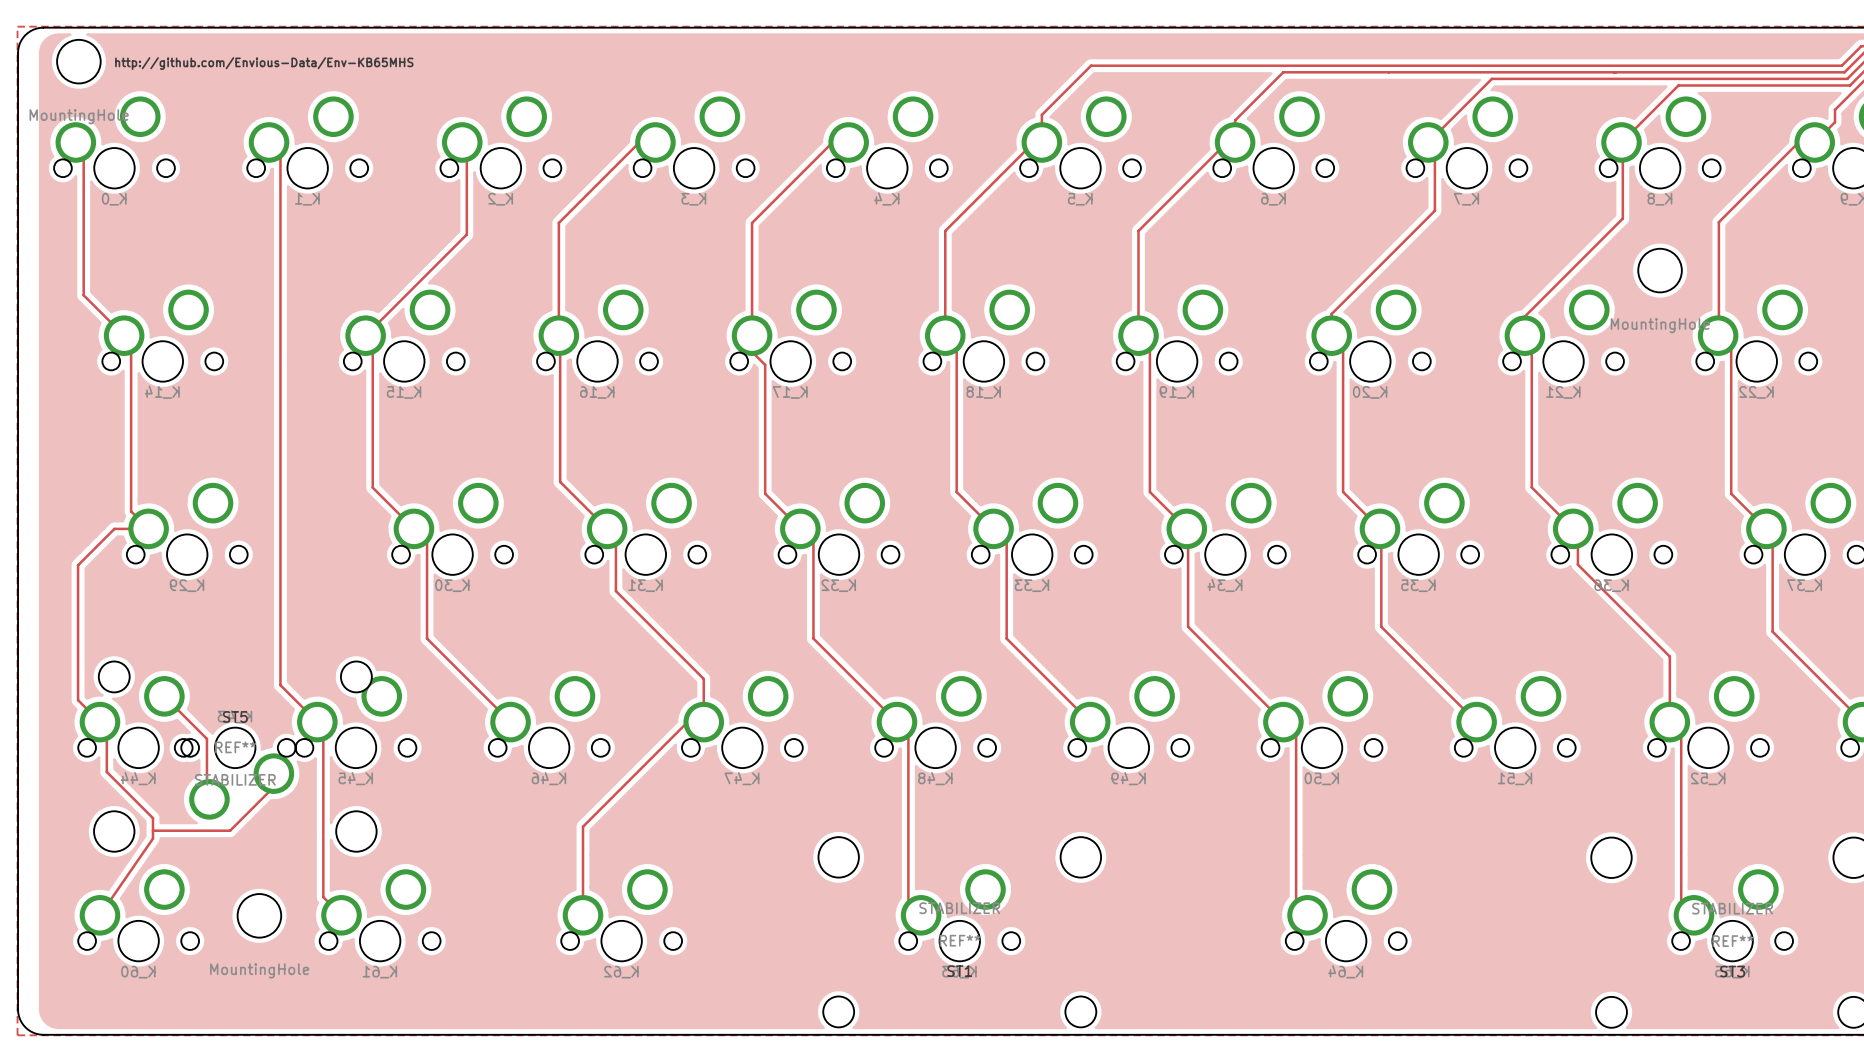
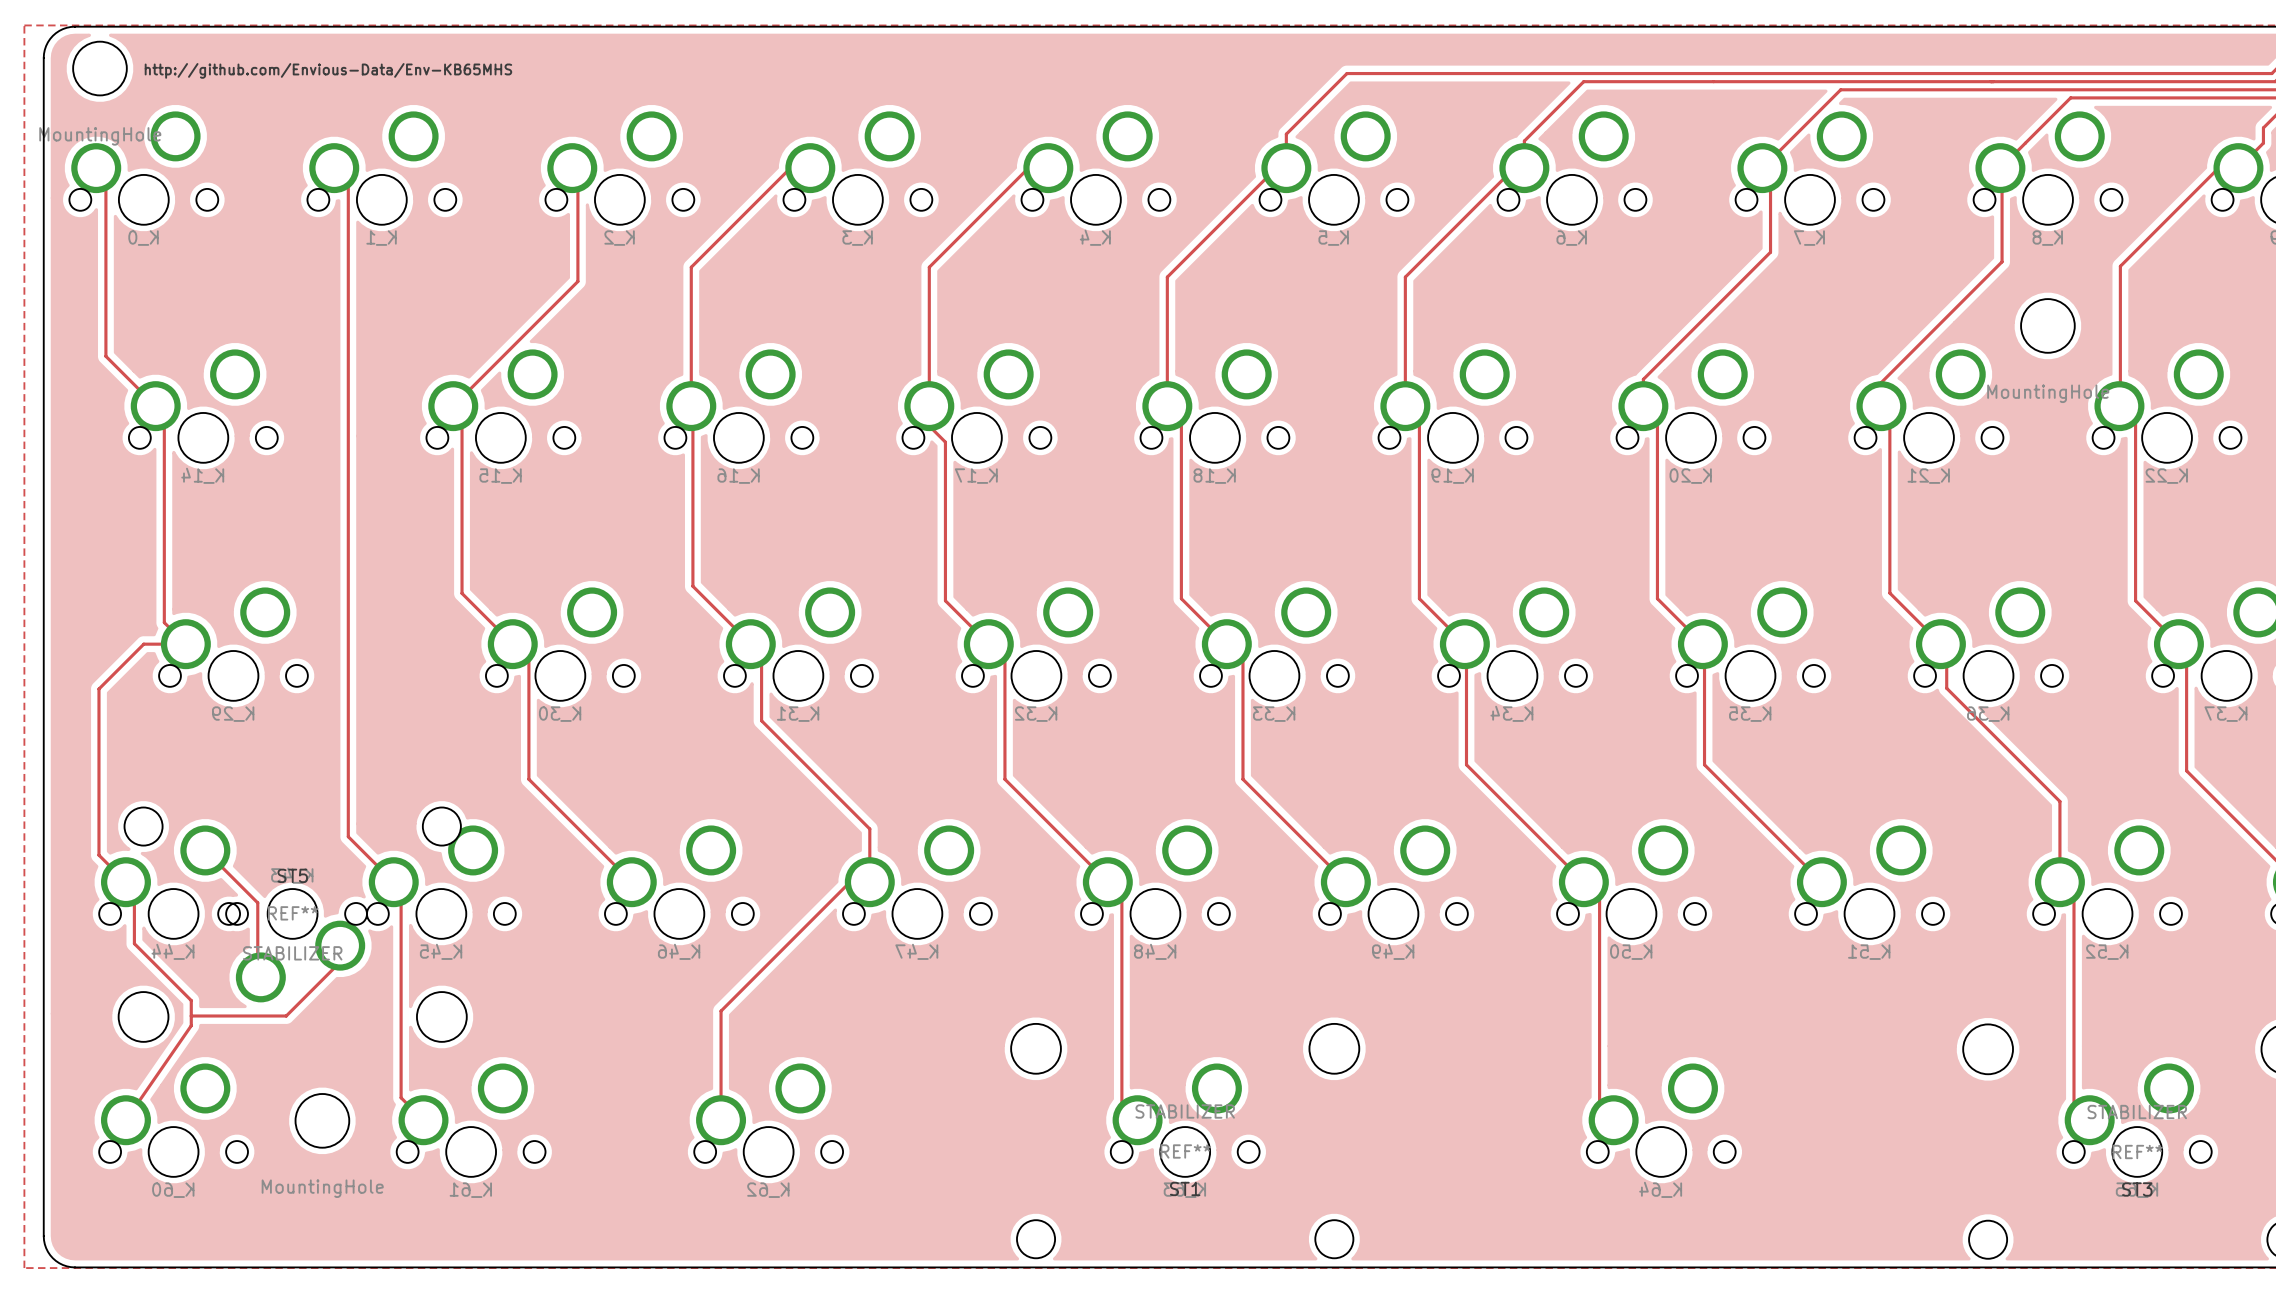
board edge: (58, 27) (40, 27) (30, 31) (21, 40) (18, 53) (18, 1009) (21, 1022) (30, 1031) (40, 1034) (58, 1034) -> (74, 26) (63, 29) (52, 35) (46, 45) (43, 57) (43, 1236) (46, 1248) (52, 1258) (63, 1265) (74, 1267)

